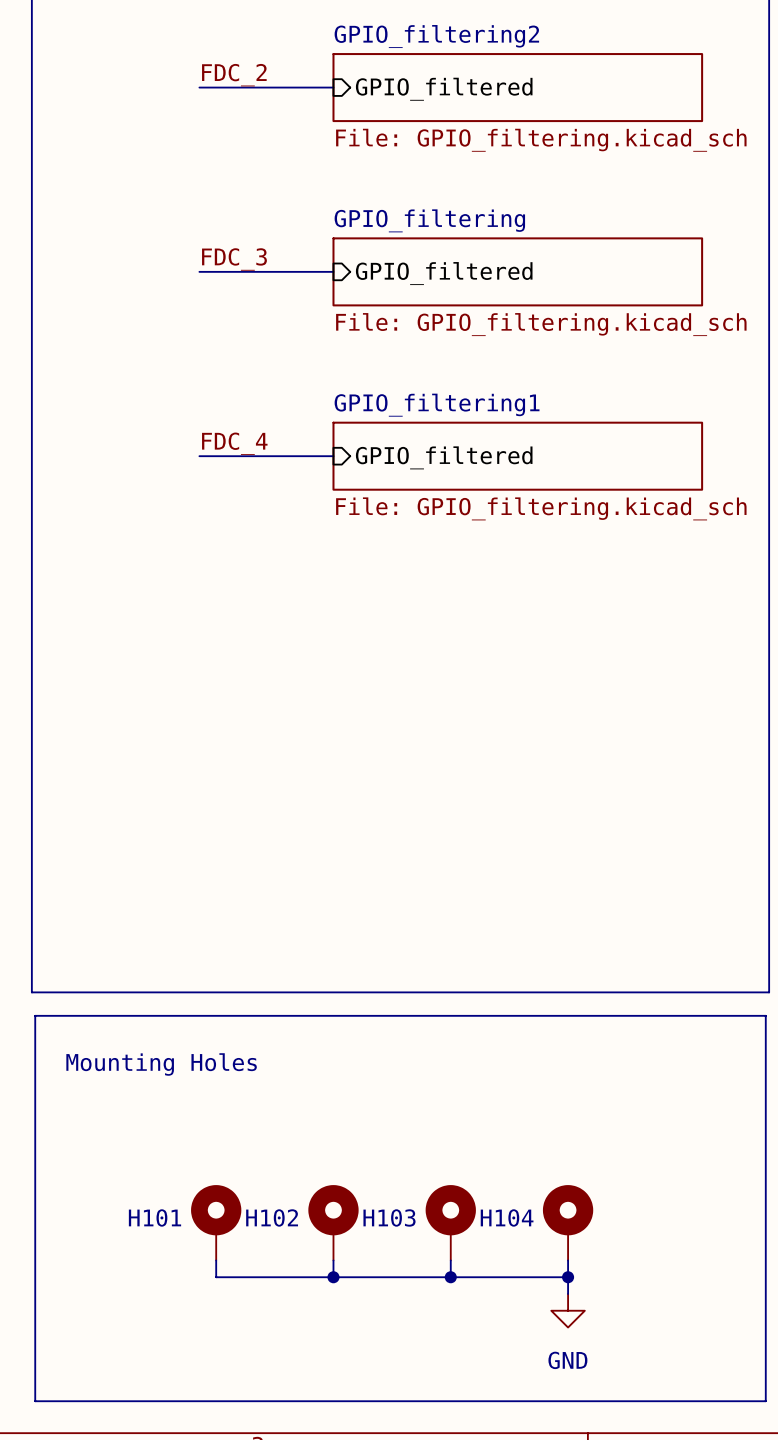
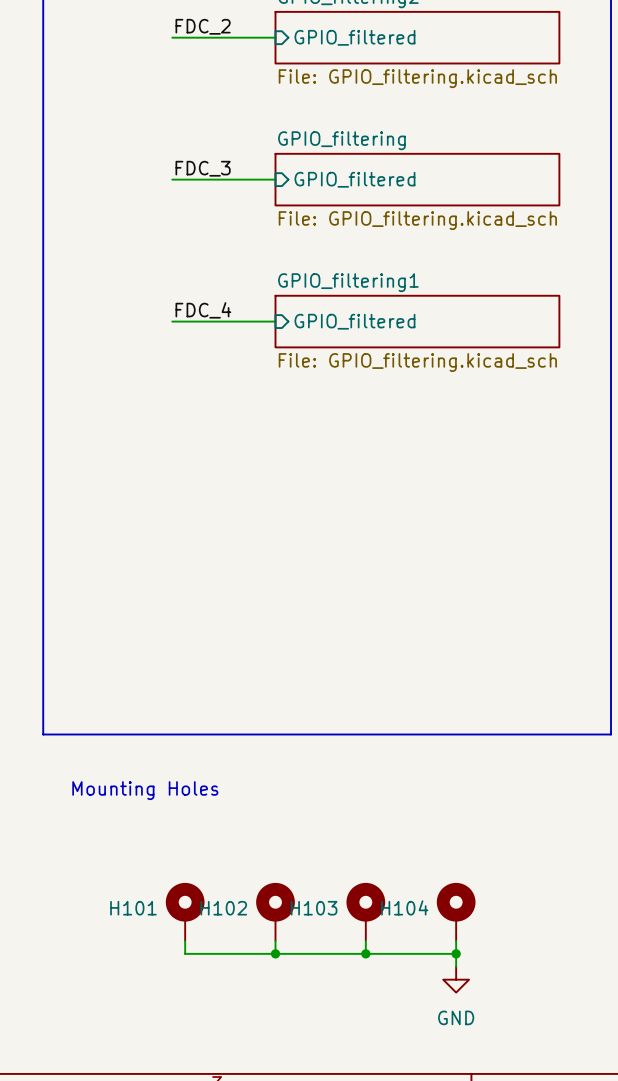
line: (35, 1015) (765, 1015) (765, 1401) (35, 1401) (35, 1015) -> none

